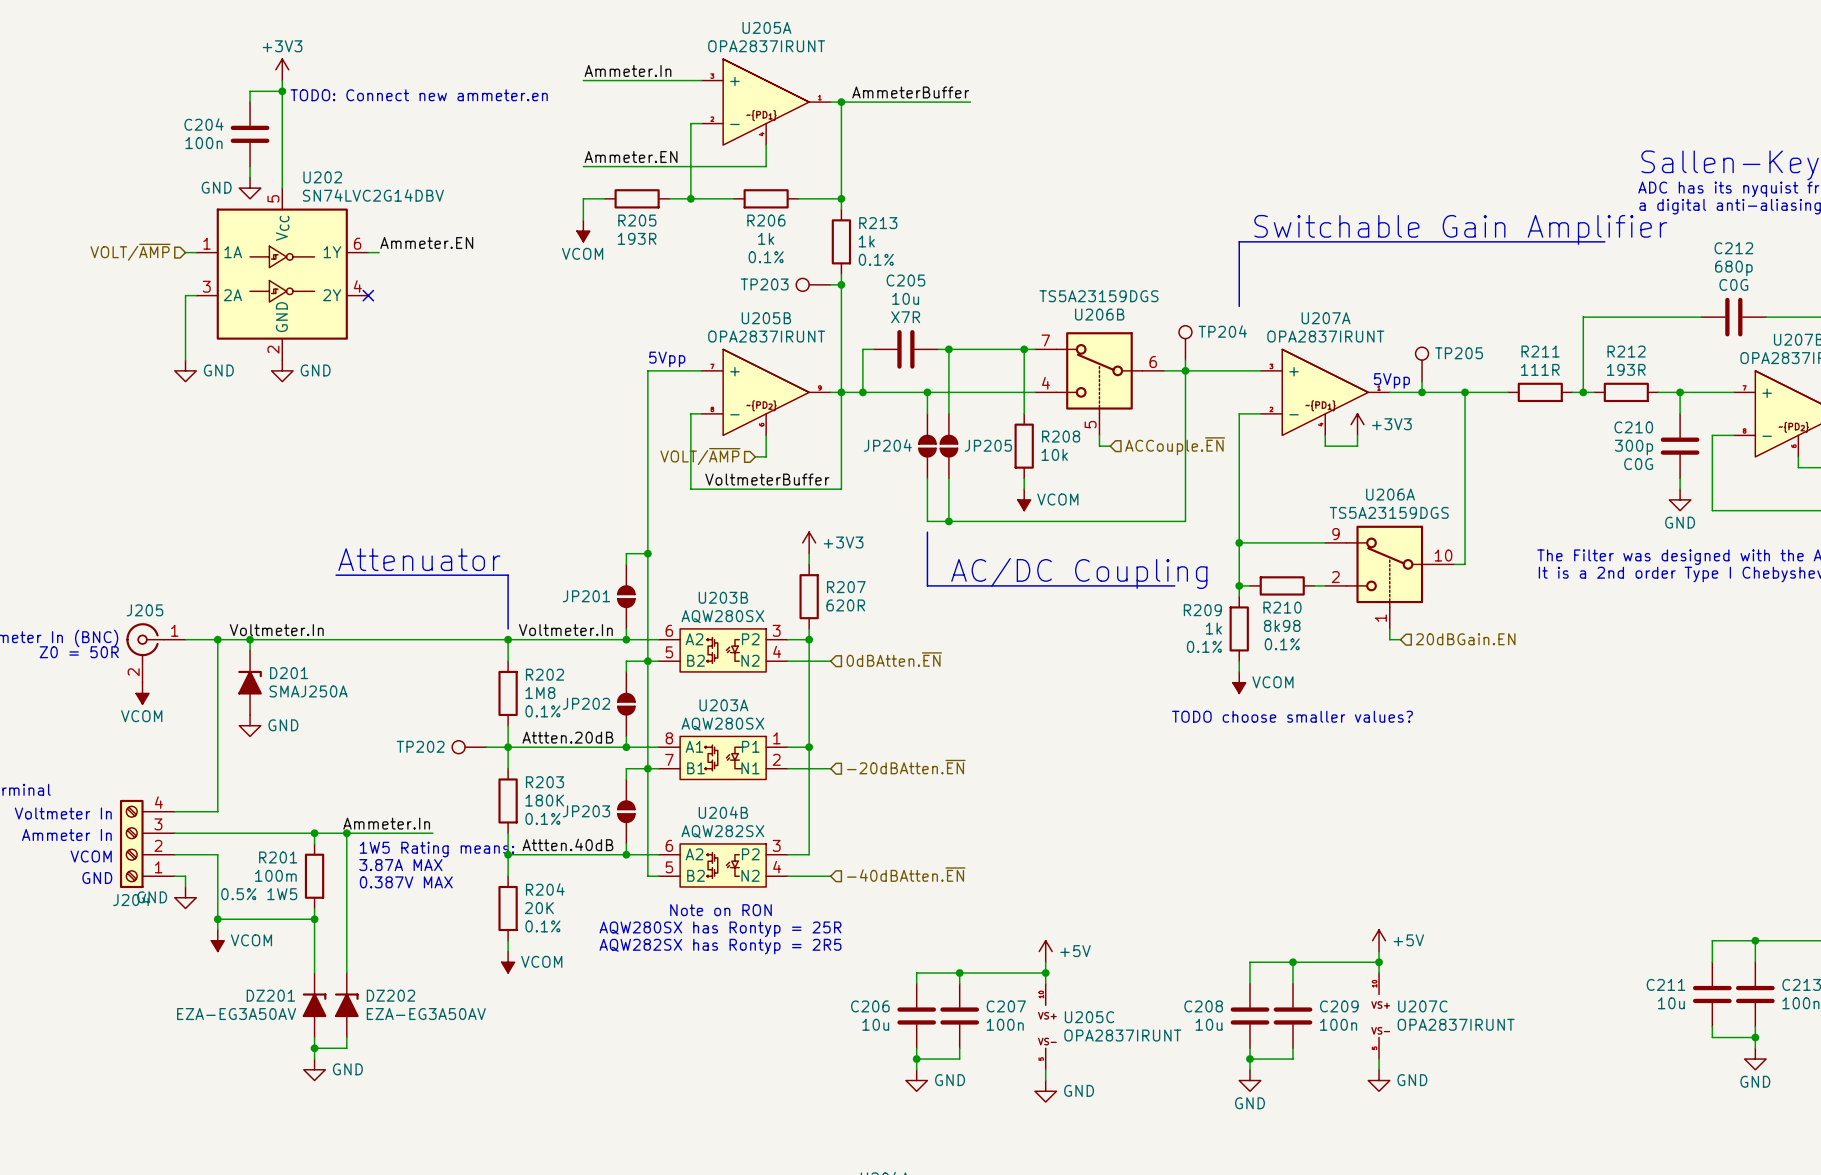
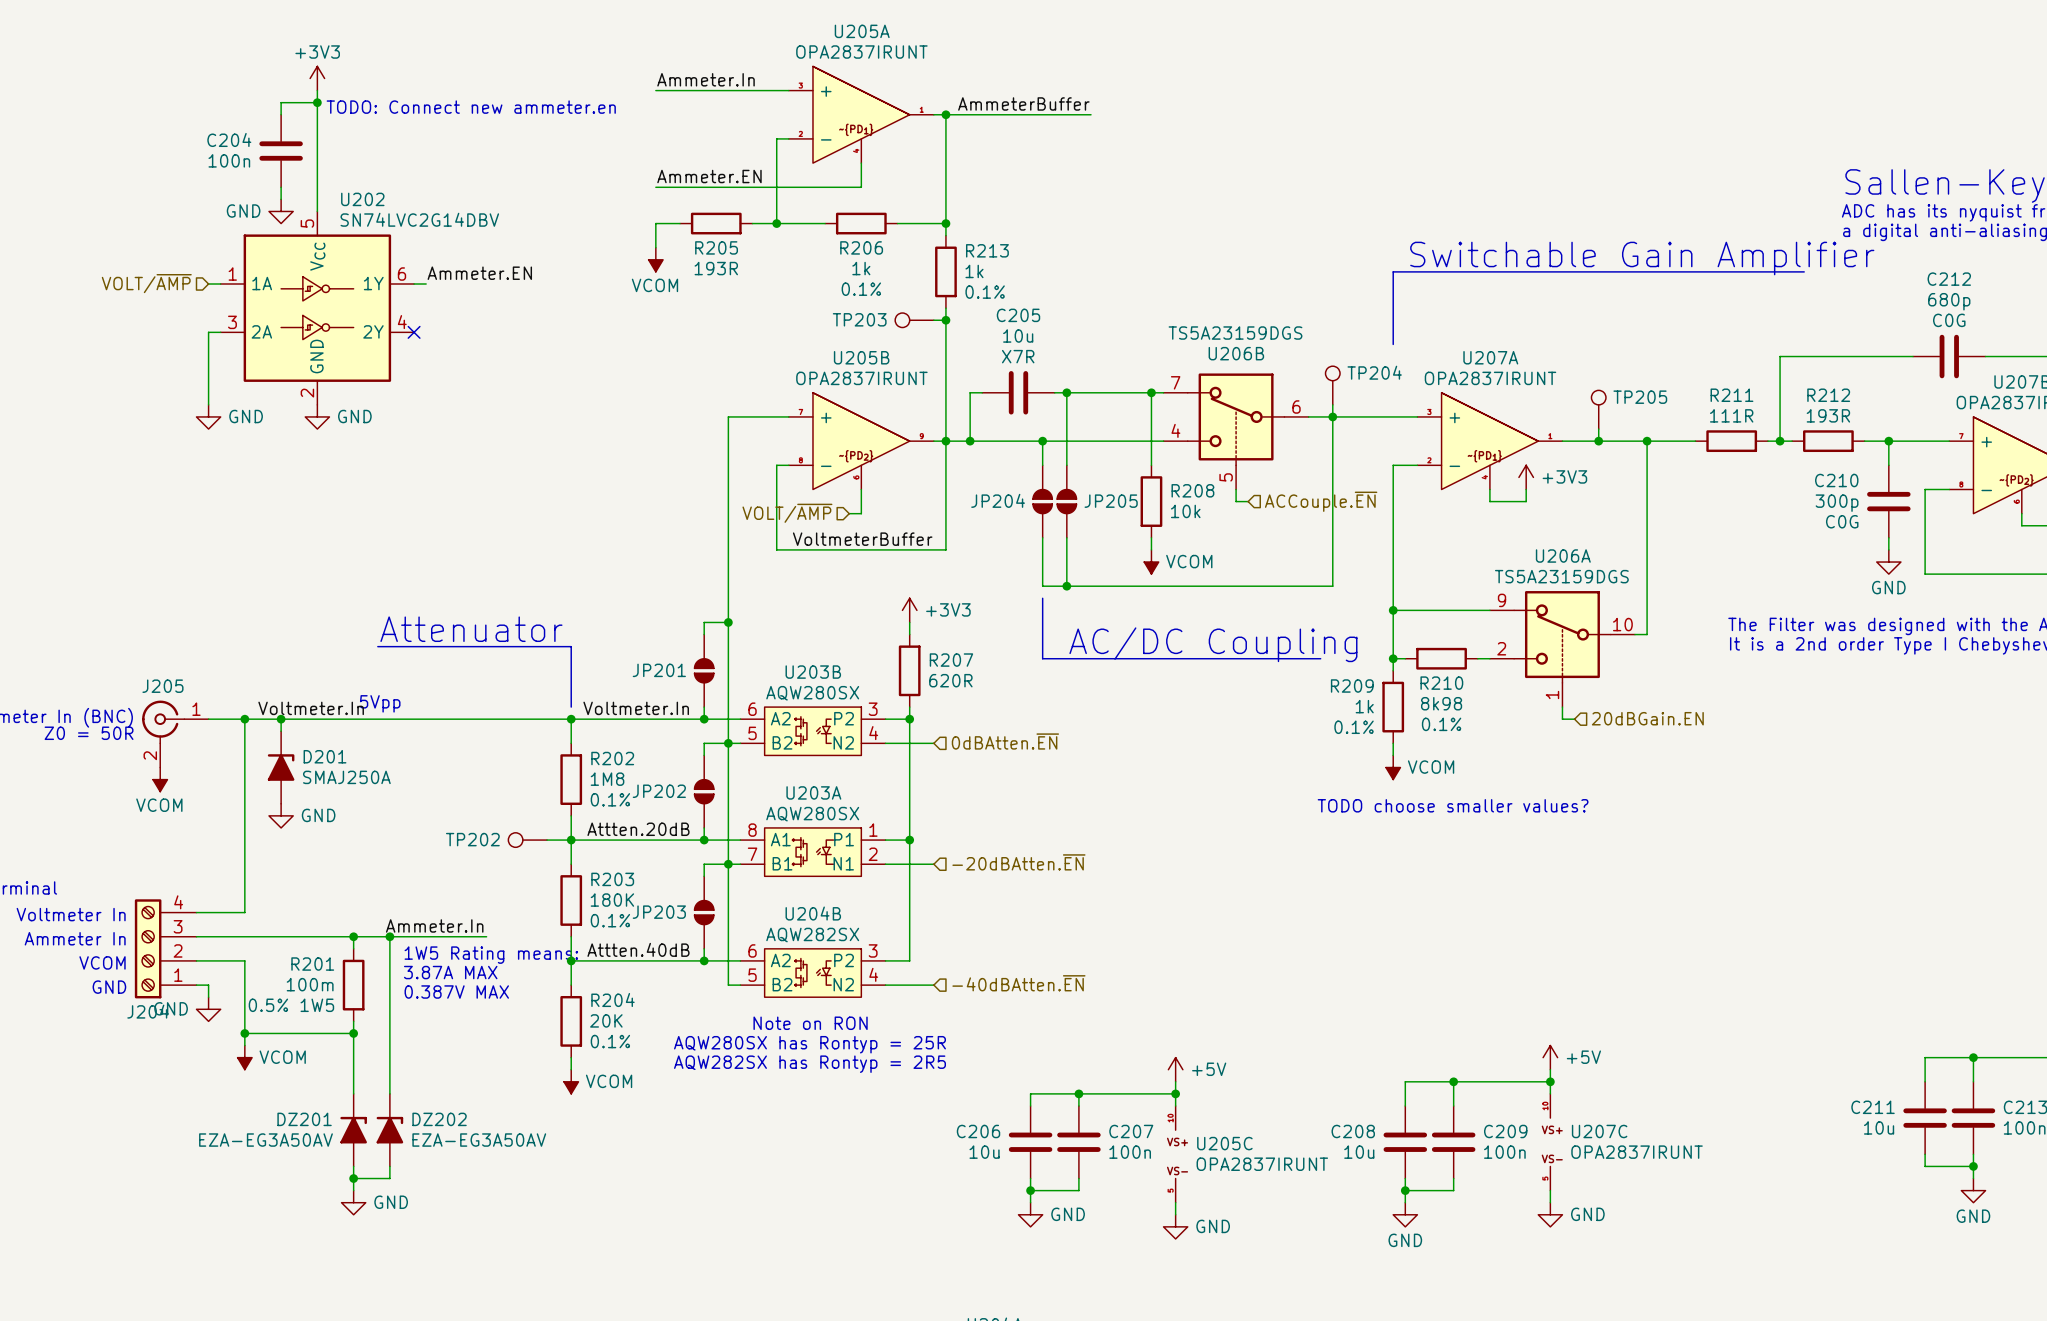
text: 5Vpp (667, 359) -> none
text: 5Vpp (1391, 380) -> none
text: none -> 5Vpp (380, 703)

